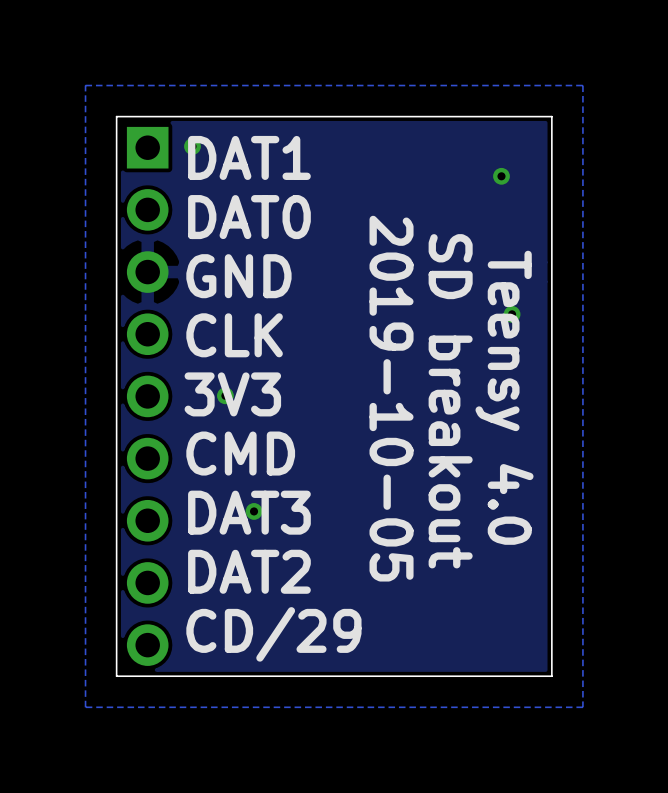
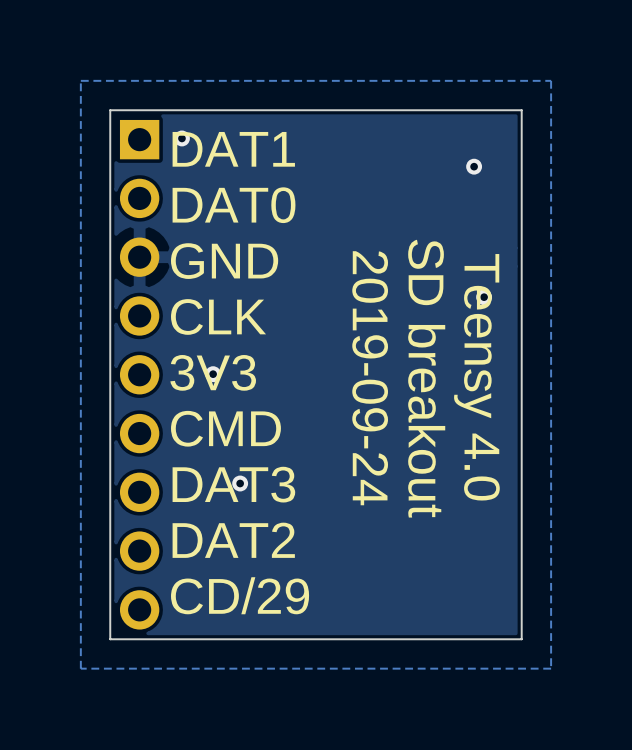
text: 2019-10-05 (391, 398) -> 2019-09-24 (370, 378)

